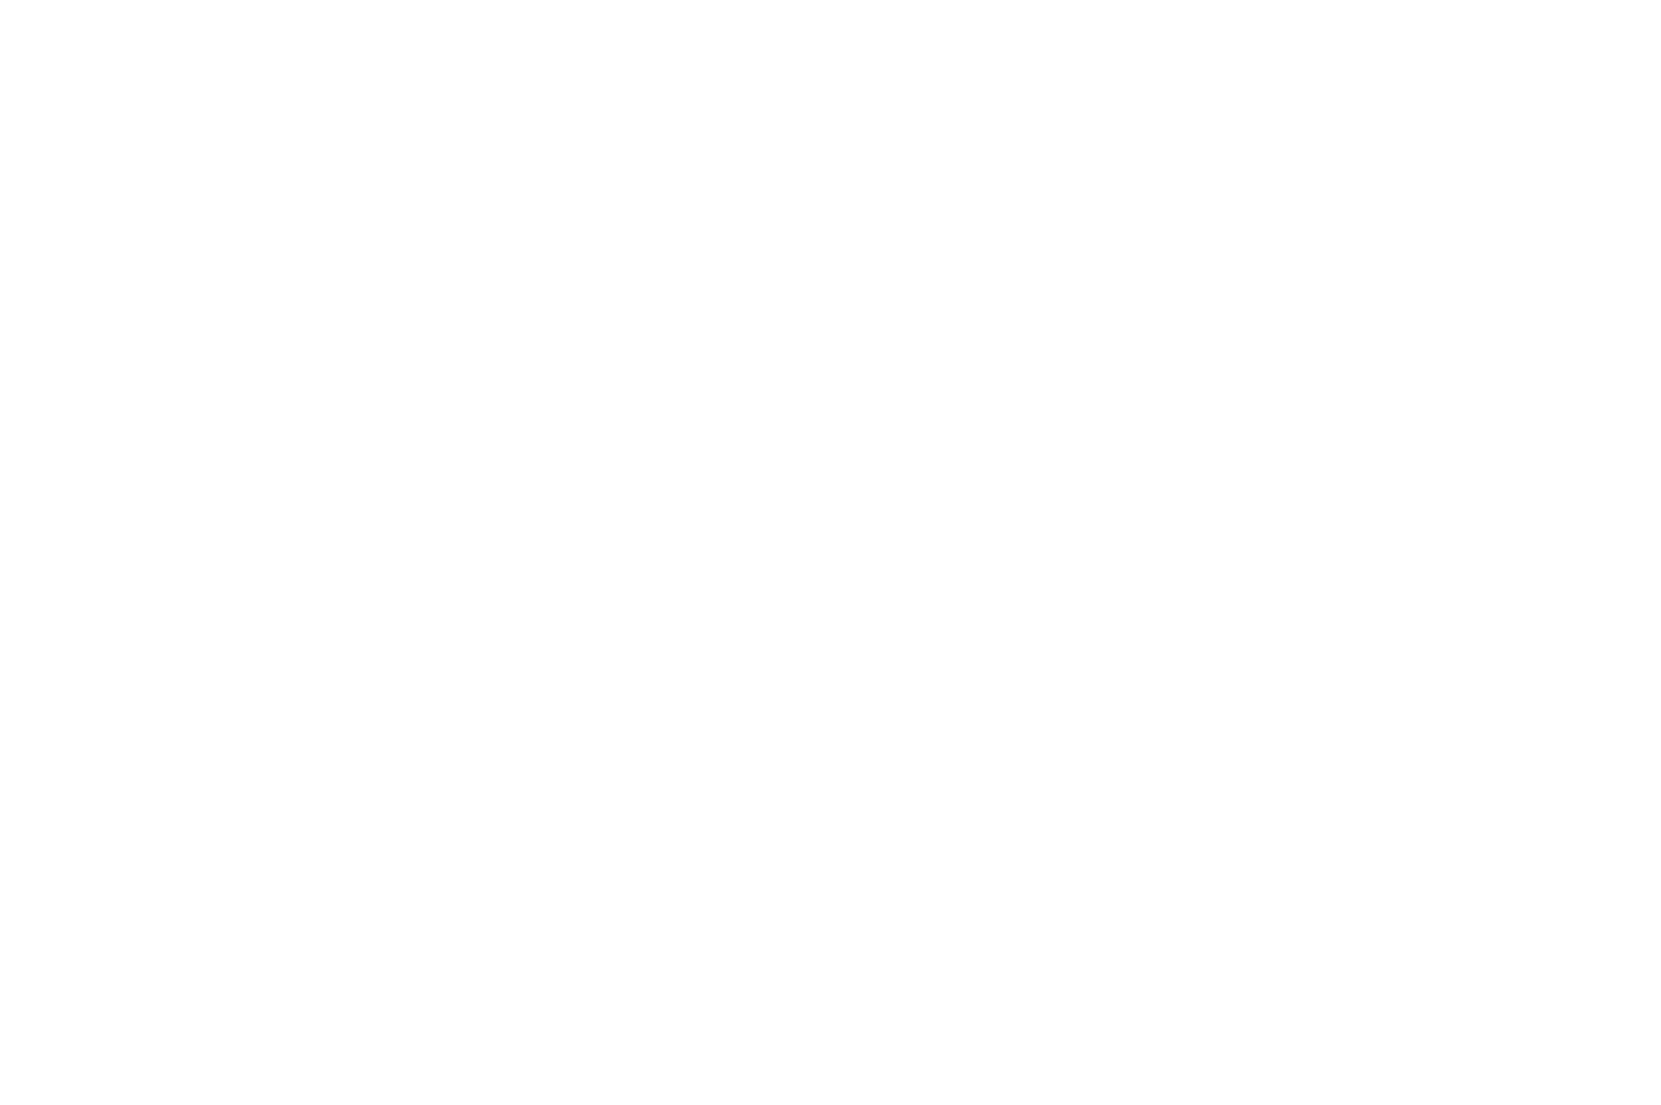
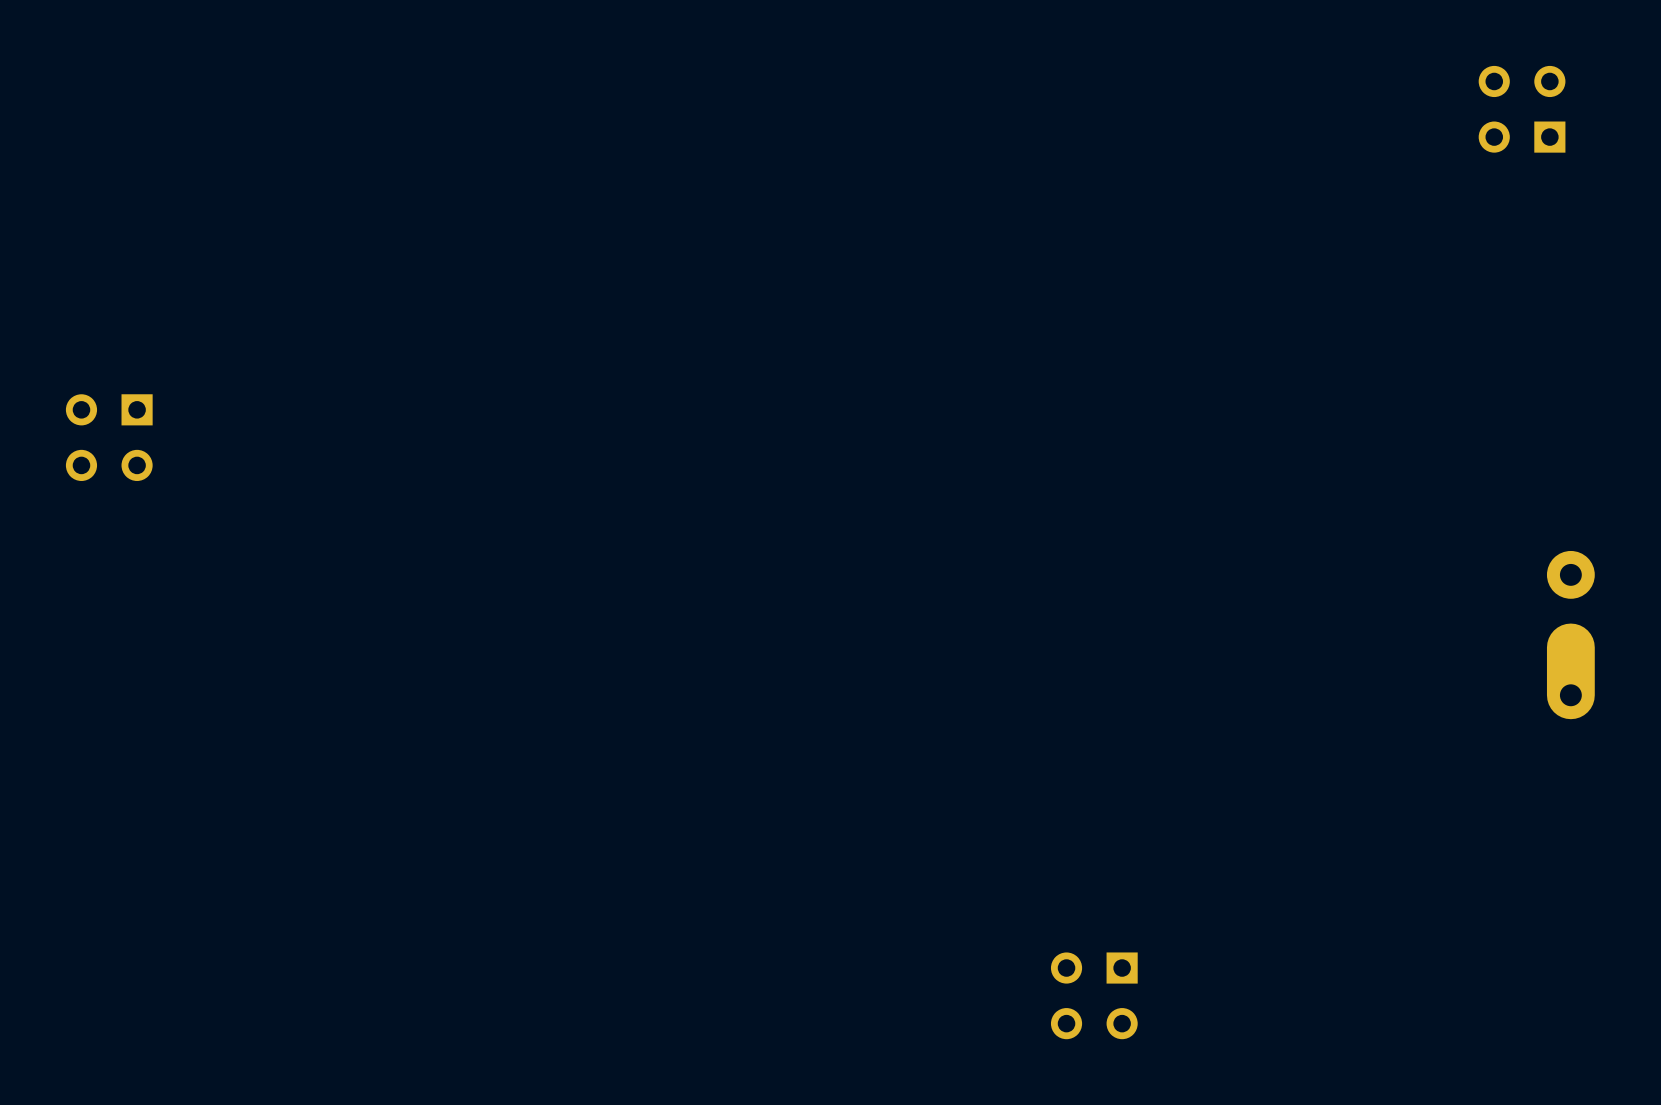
part: none -> (1522, 109)
part: none -> (109, 437)
part: none -> (1570, 635)
part: none -> (1094, 995)

